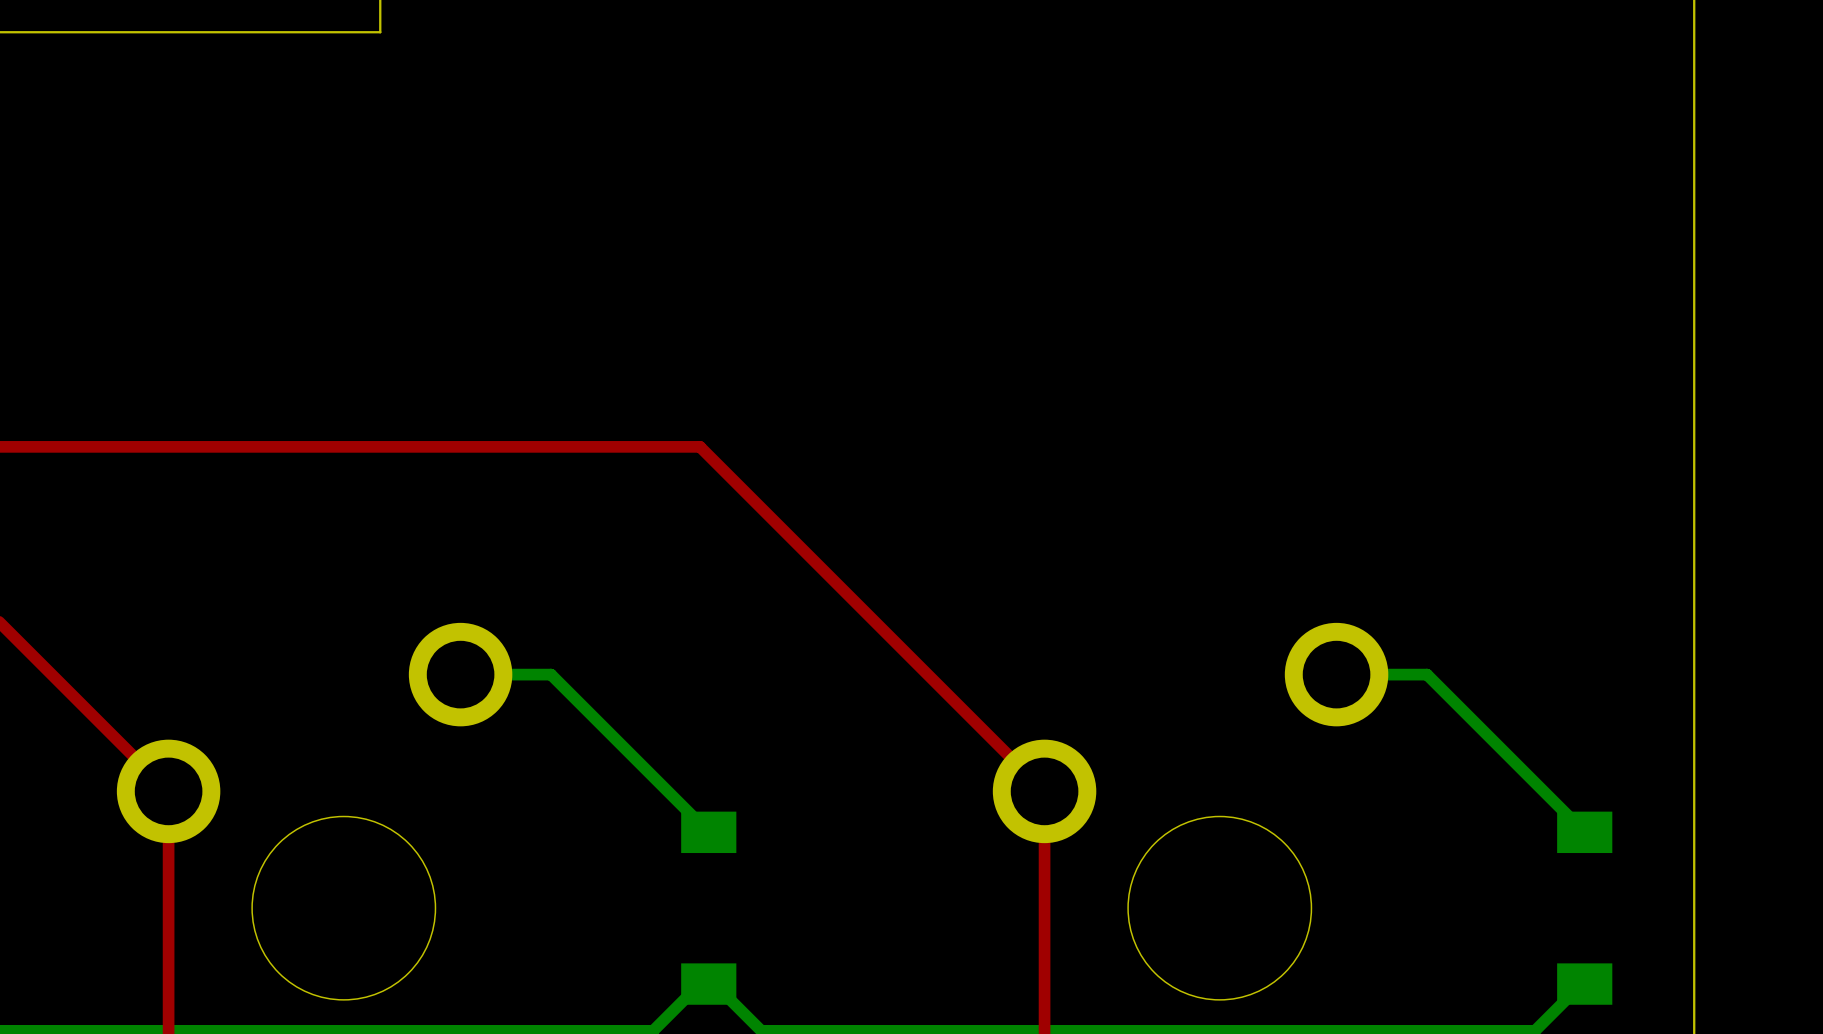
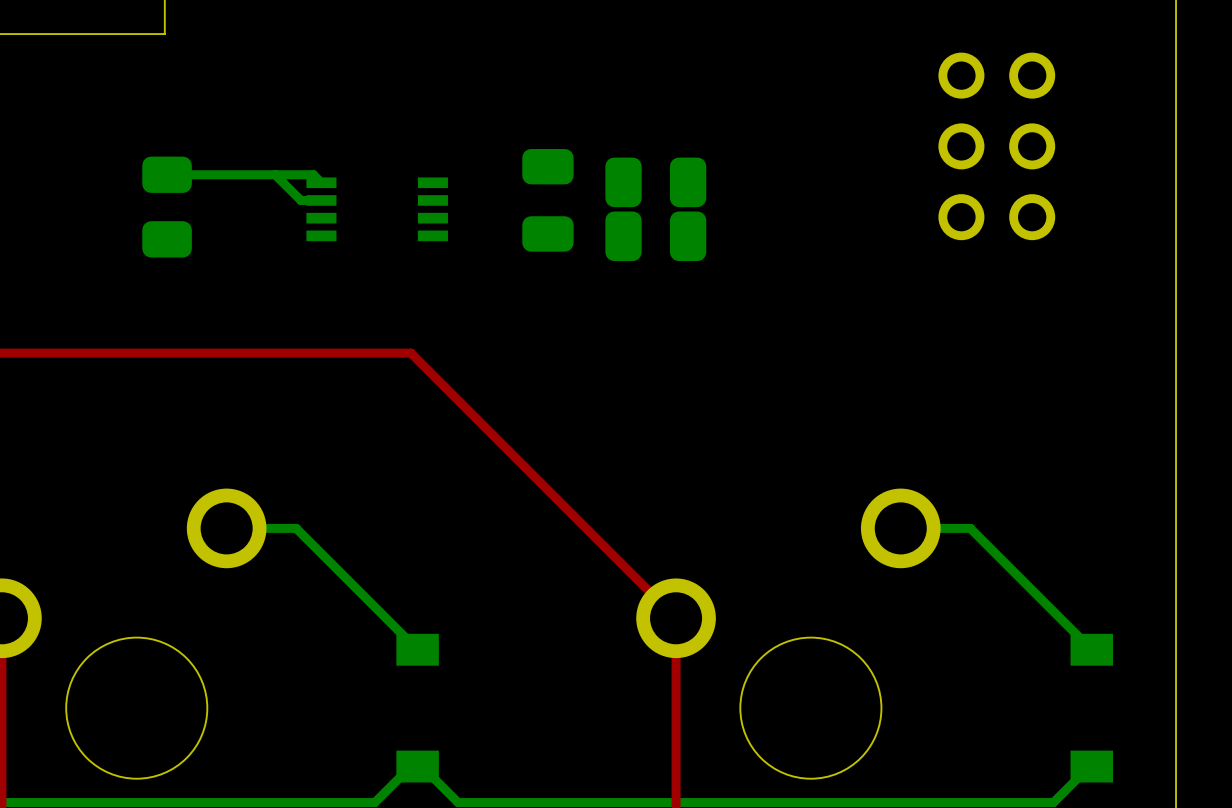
part: none -> (996, 146)
bottom track: none -> (167, 174) (313, 174) (321, 182)
bottom track: none -> (275, 174) (300, 200) (321, 200)
part: none -> (655, 182)
part: none -> (547, 200)
part: none -> (167, 207)
part: none -> (377, 209)
part: none -> (655, 236)

